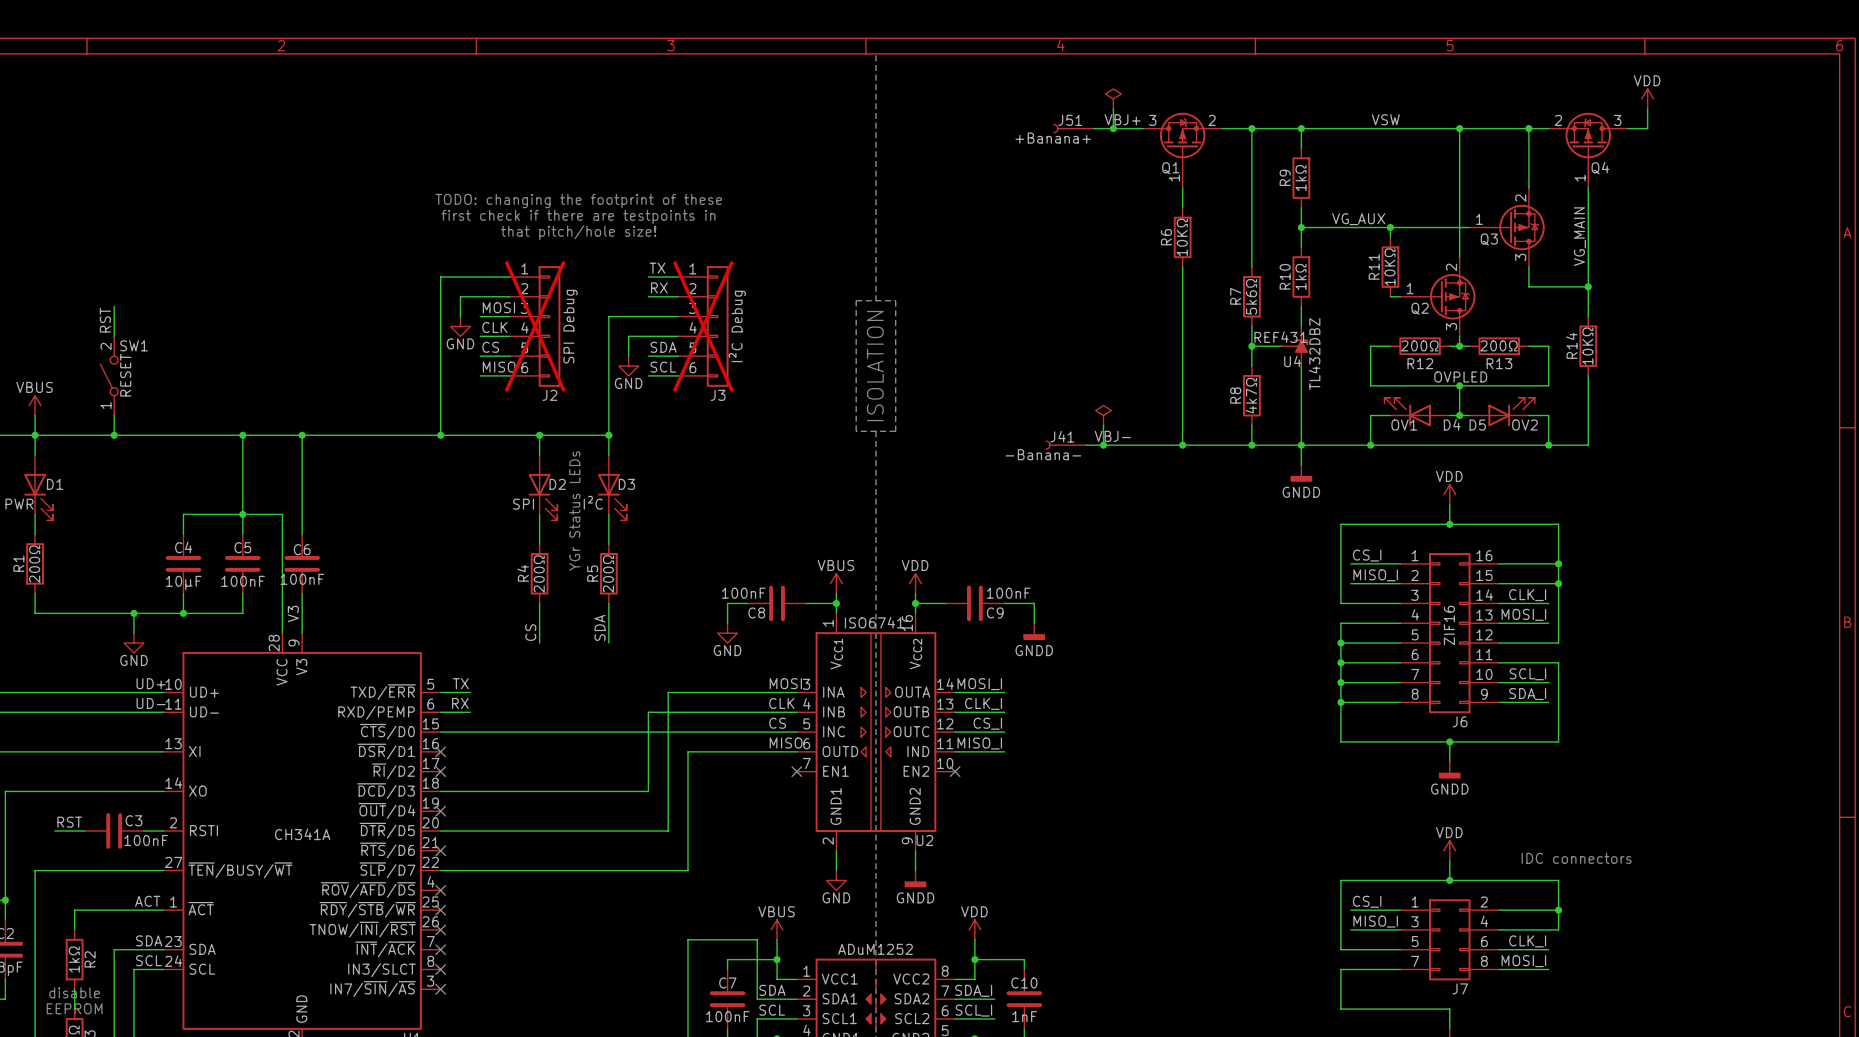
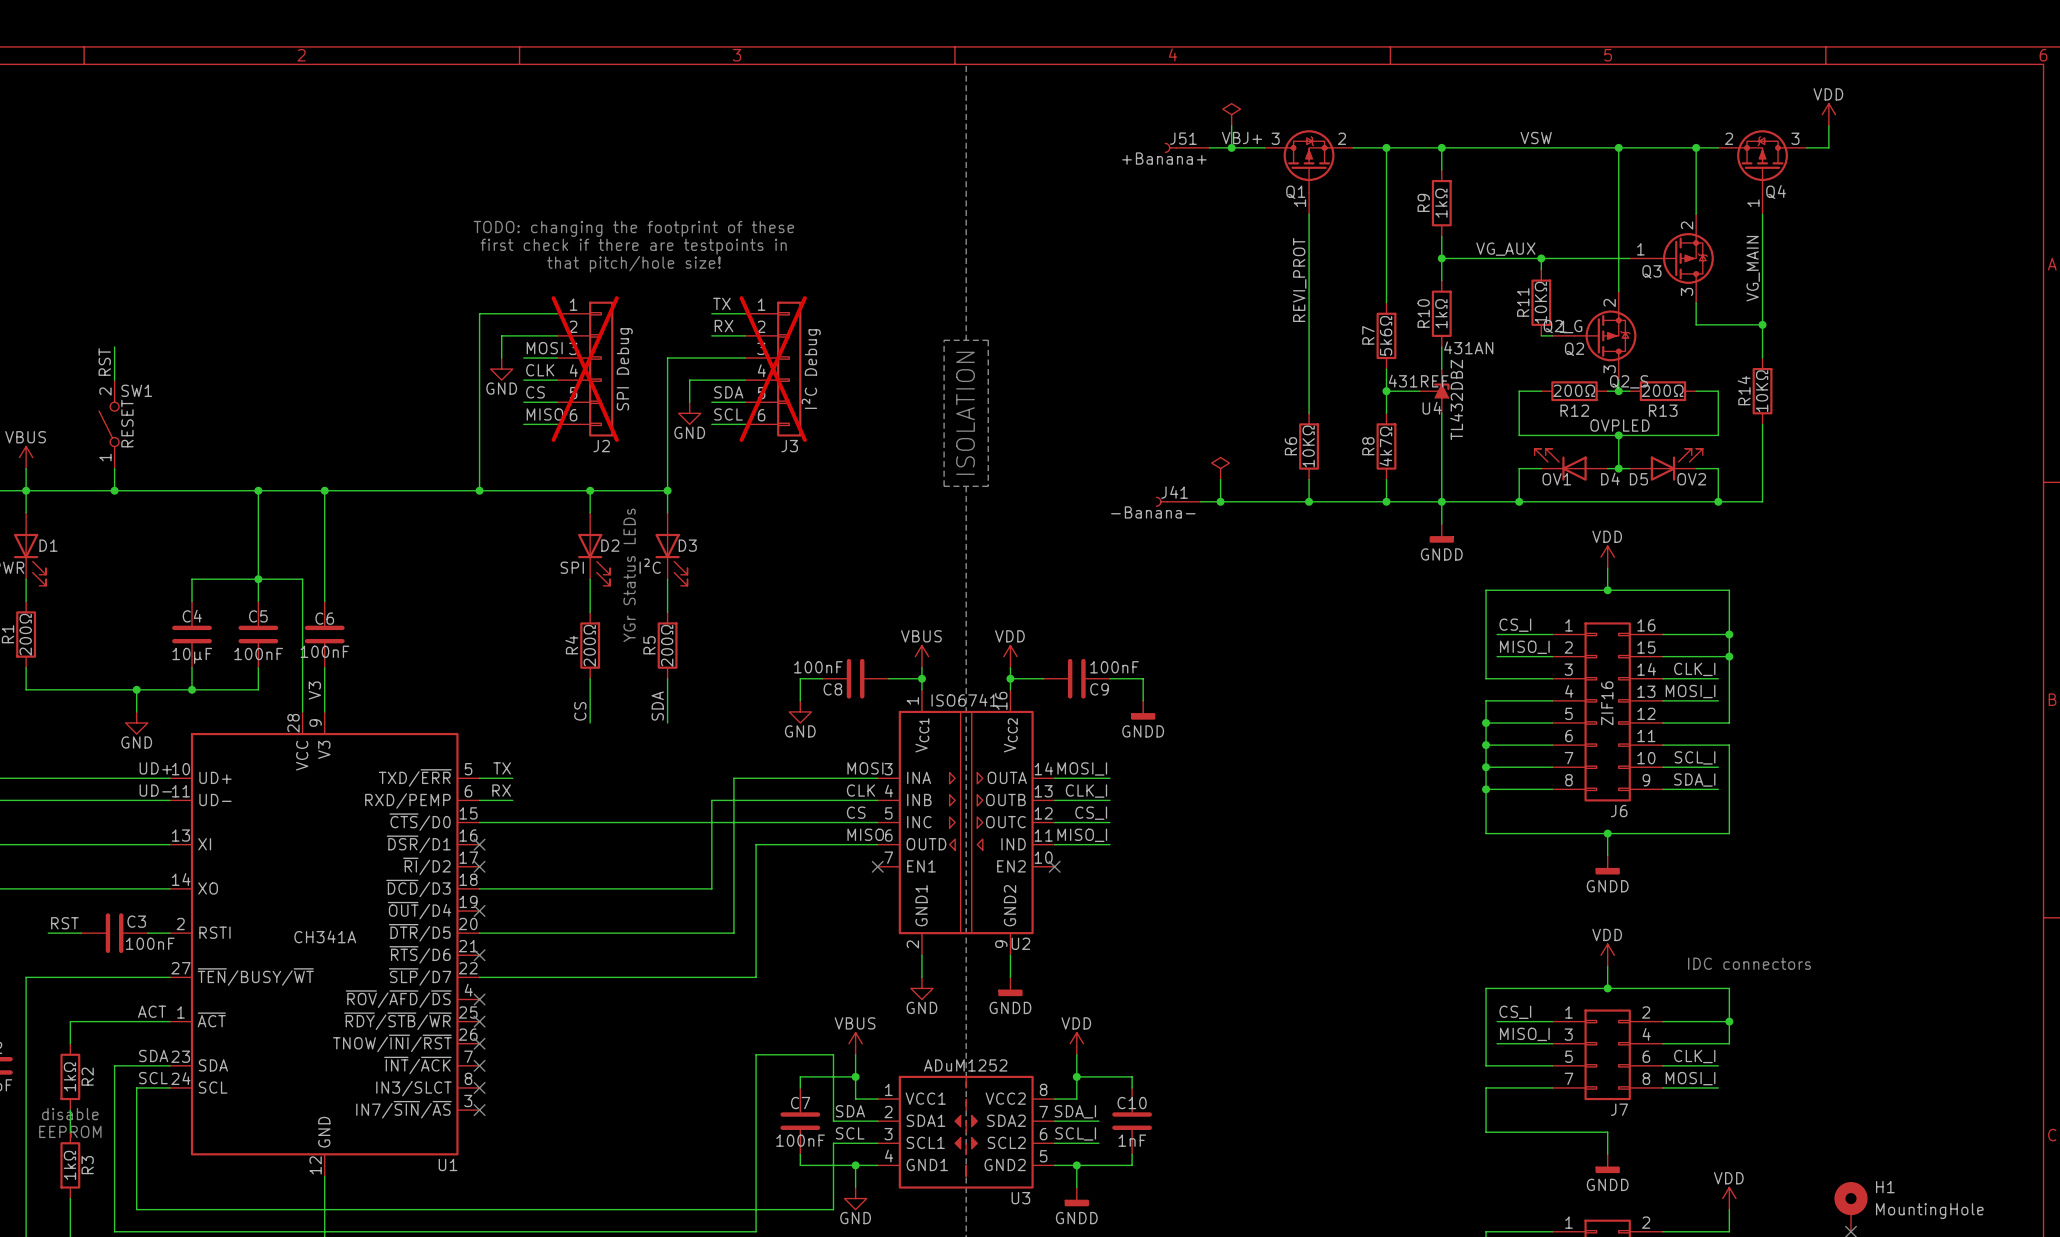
R6 position: (1182, 237) -> (1309, 446)
label: none -> REVI_PROT (1299, 279)
label: none -> Q2_G (1563, 326)
label: none -> 431AN (1468, 347)
label: REF431 (1280, 337) -> 431REF (1418, 381)
label: none -> Q2_S (1629, 381)
label: VBJ- (1112, 436) -> none

